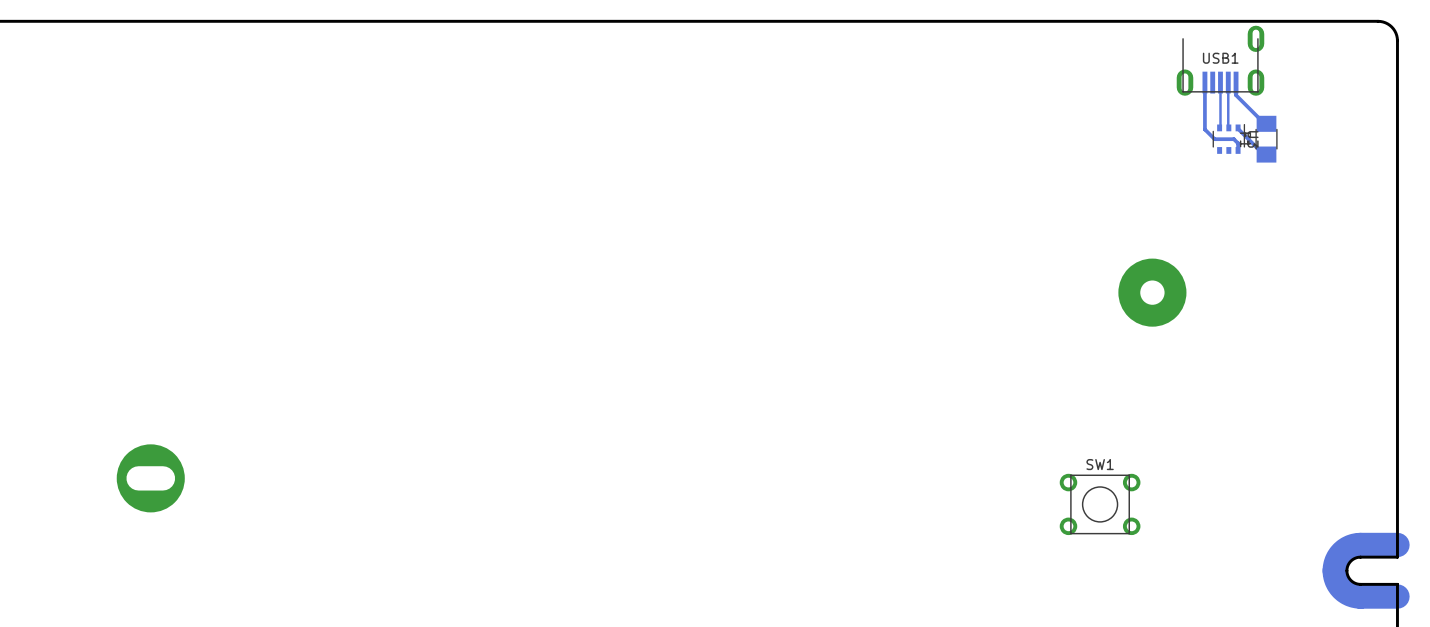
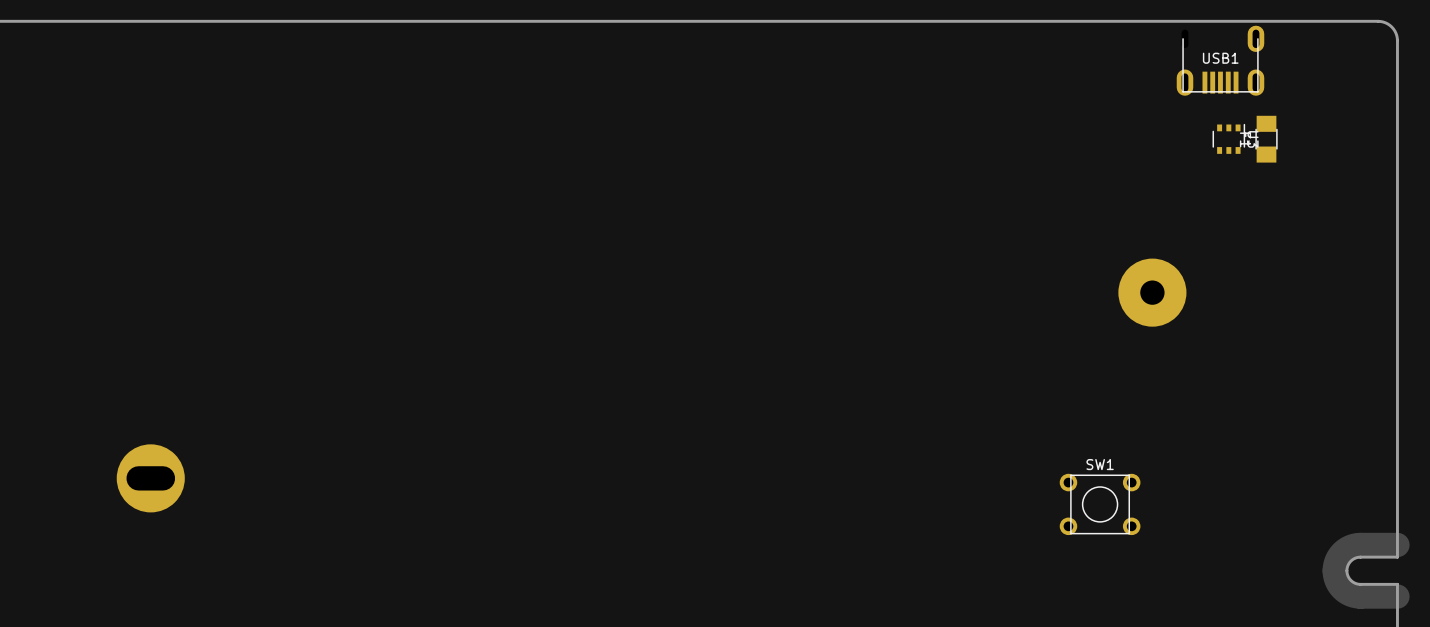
track: (1204, 82) (1204, 129) (1214, 139) (1233, 139) (1238, 143) (1238, 150) -> none
track: (1220, 82) (1219, 127) -> none
track: (1228, 82) (1228, 127) -> none
track: (1236, 82) (1236, 95) (1266, 123) -> none
track: (1238, 127) (1263, 154) (1266, 154) -> none

